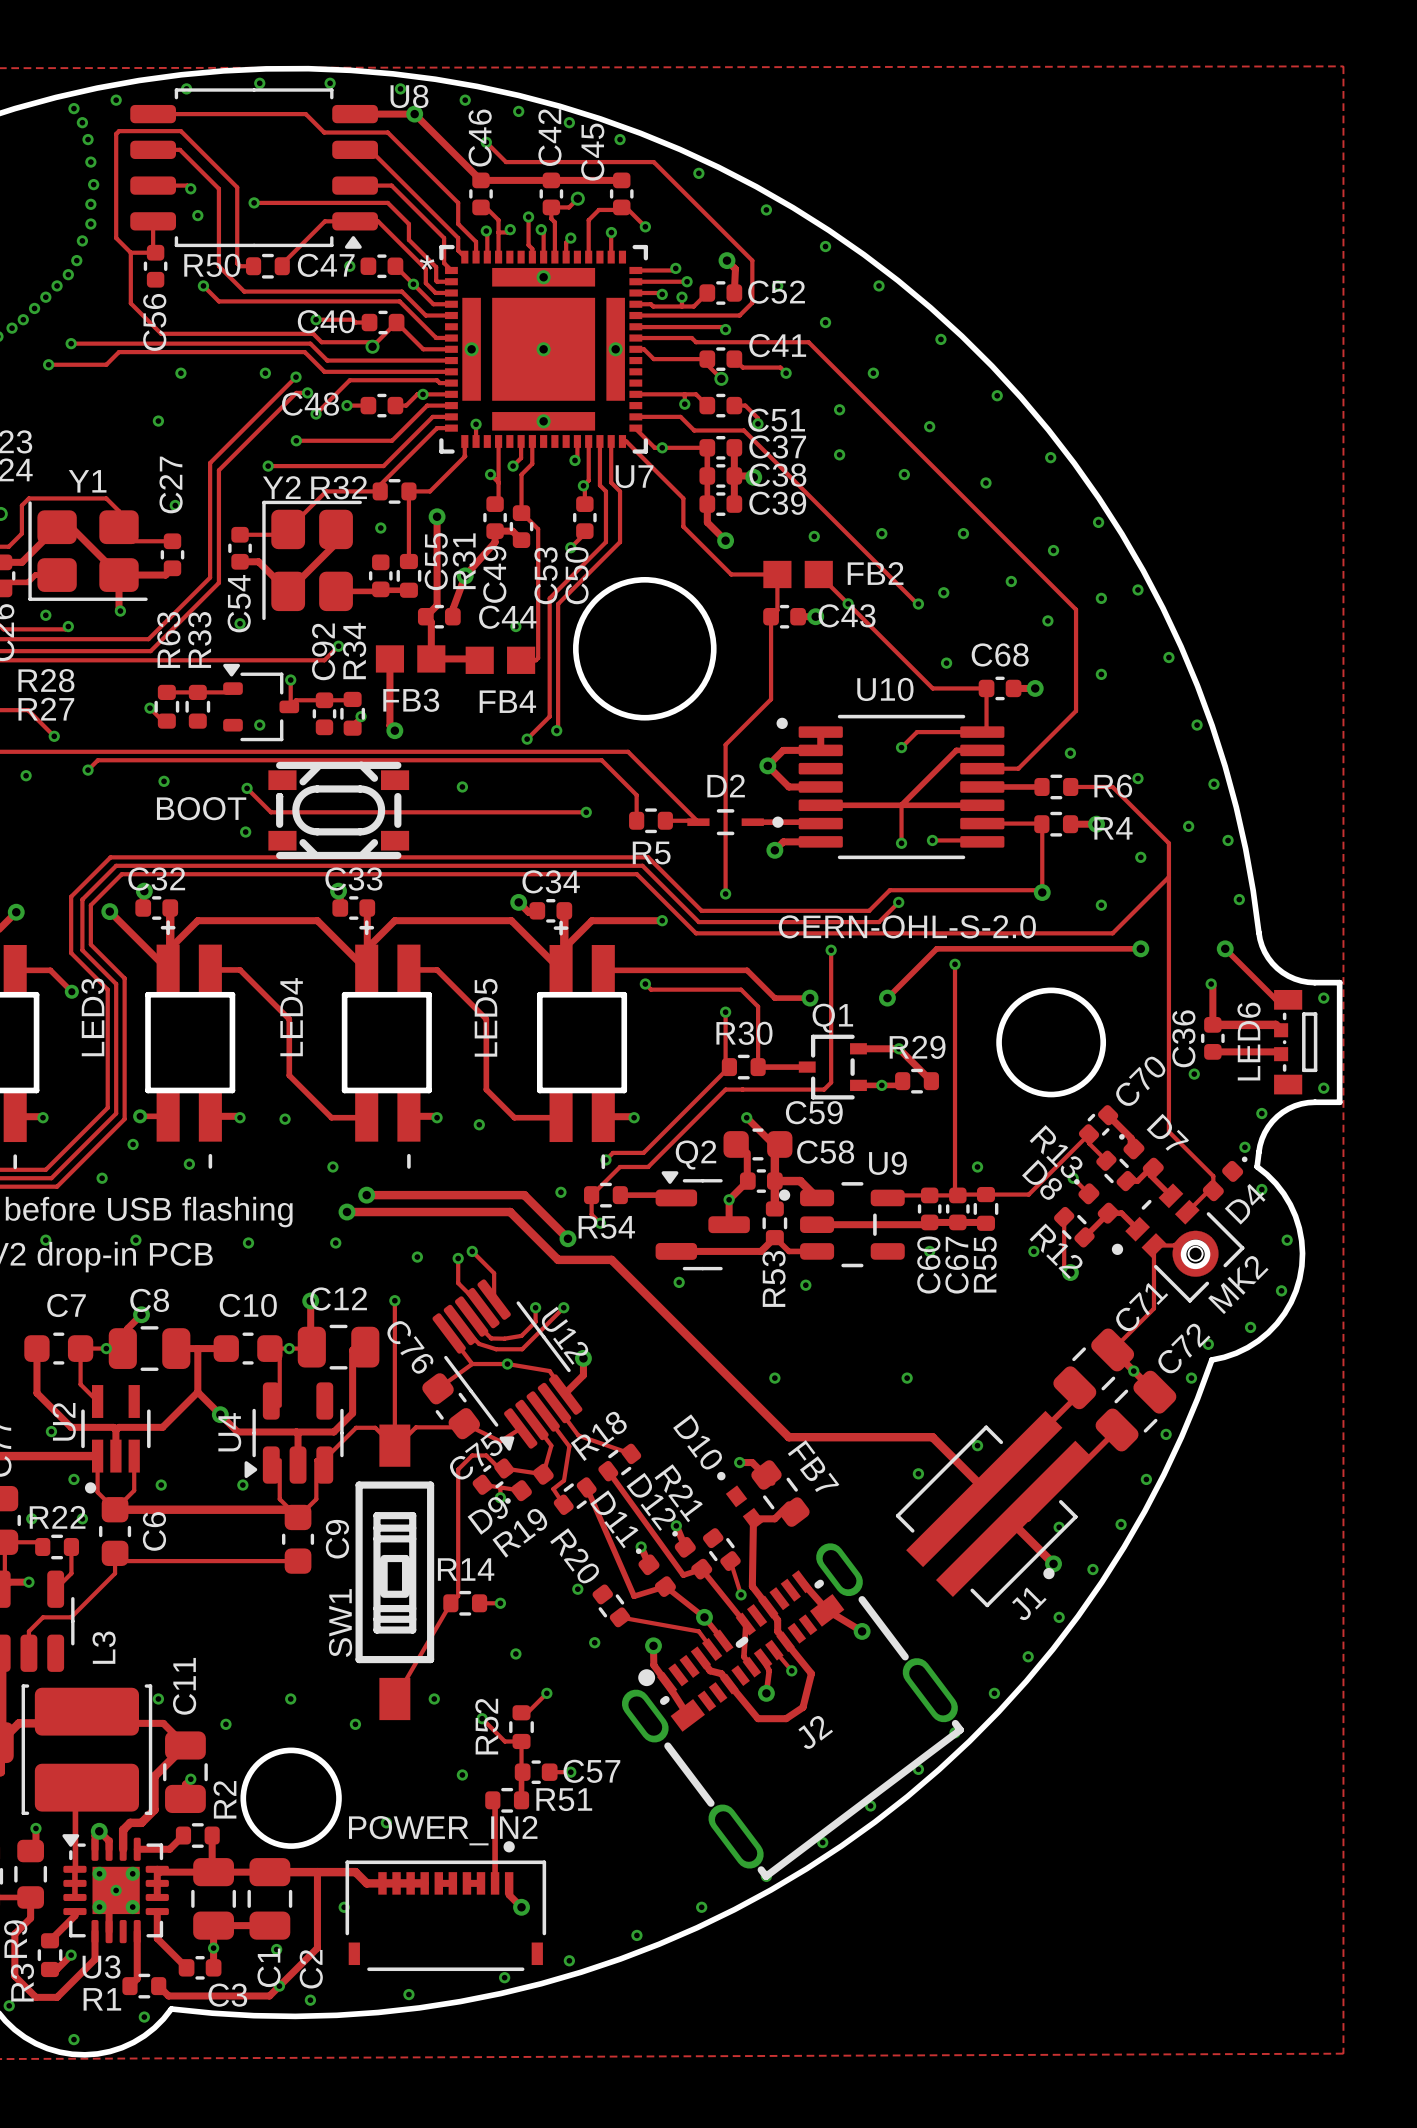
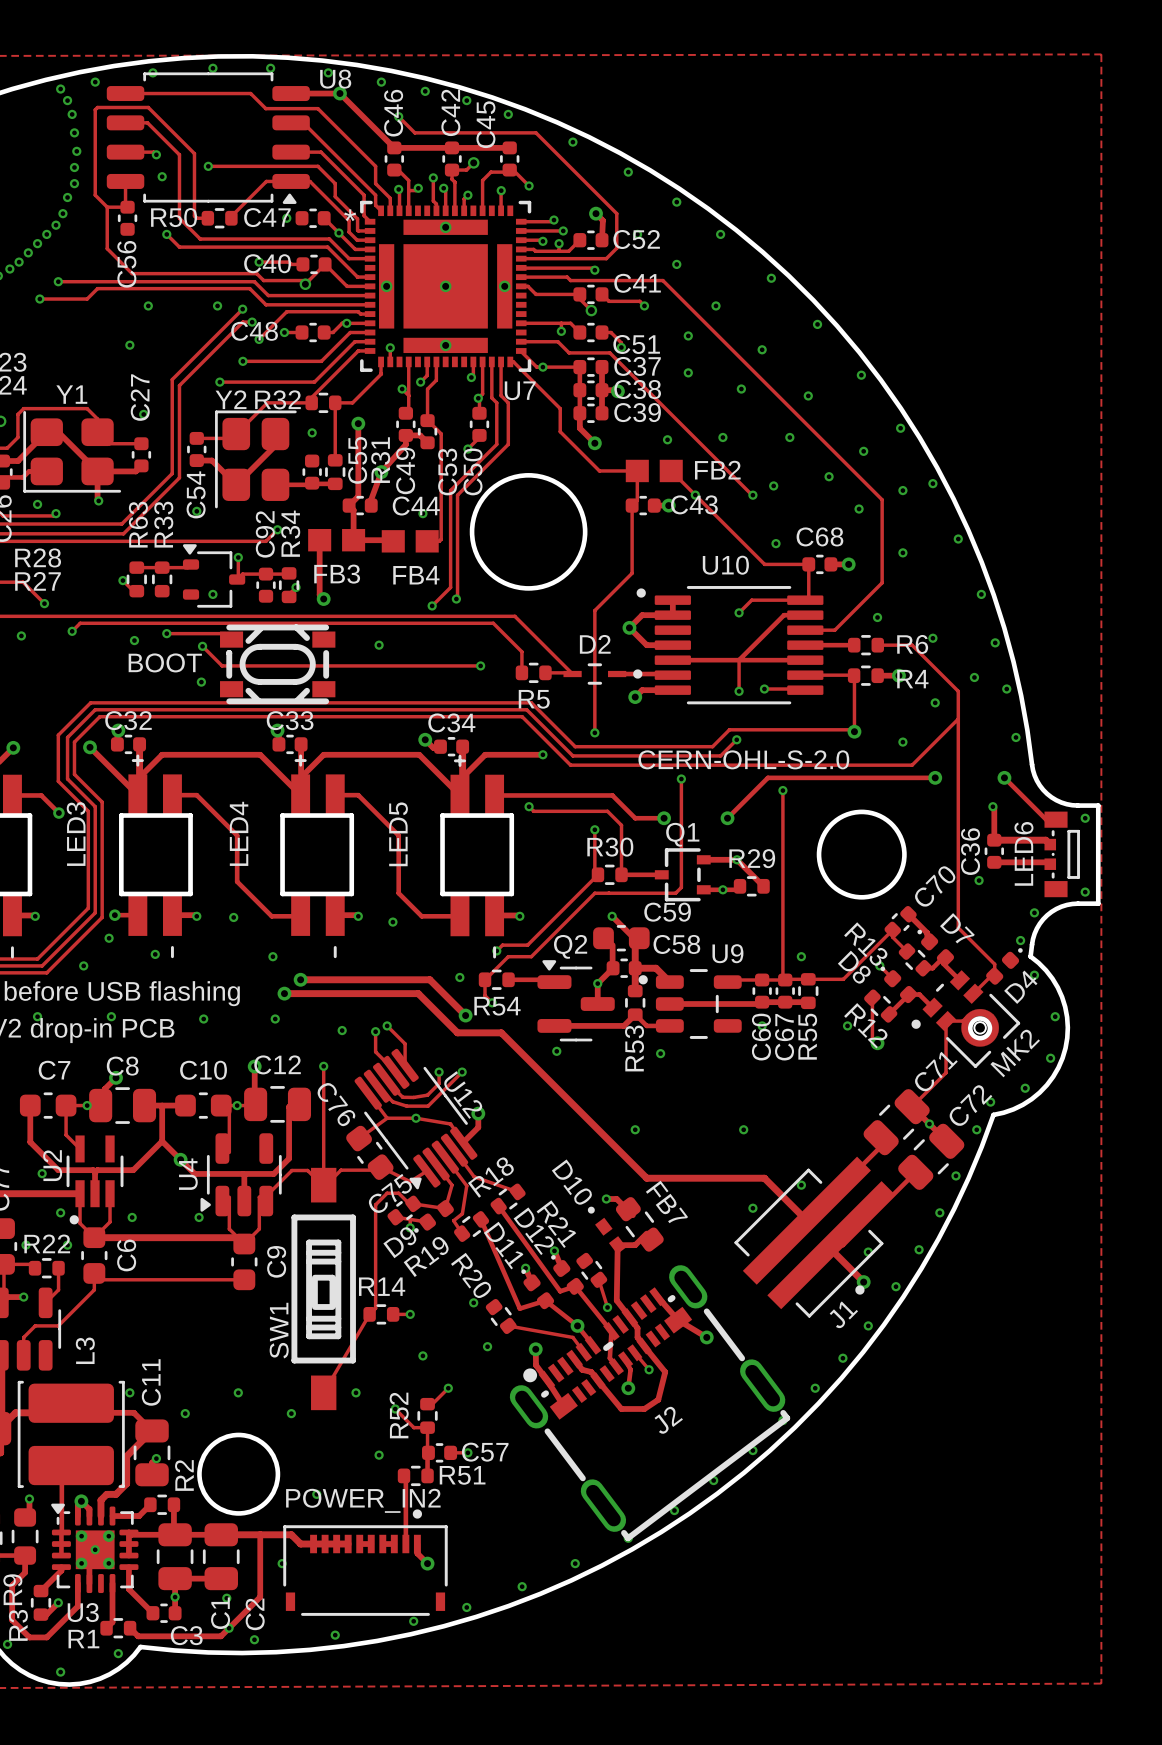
track: none -> (166, 633) (225, 633) (231, 639)
via: none -> (166, 633)

